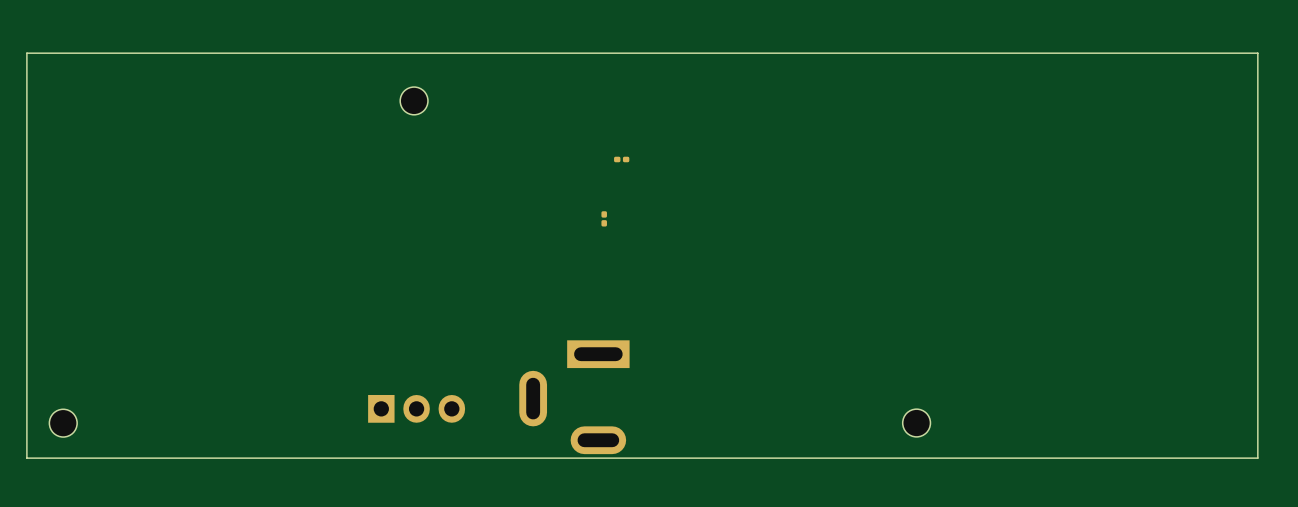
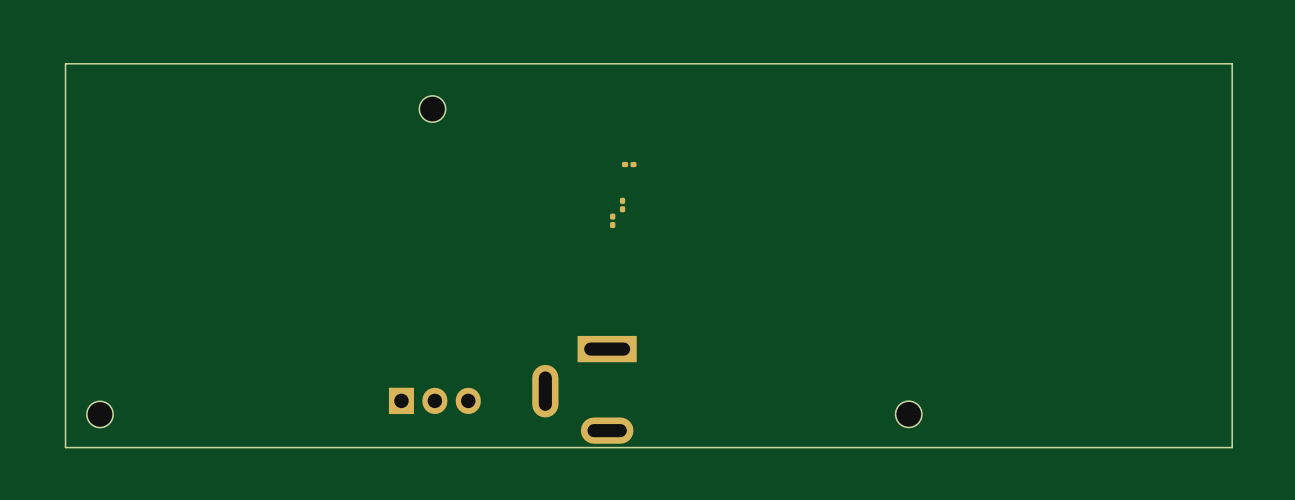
part: none -> (622, 205)

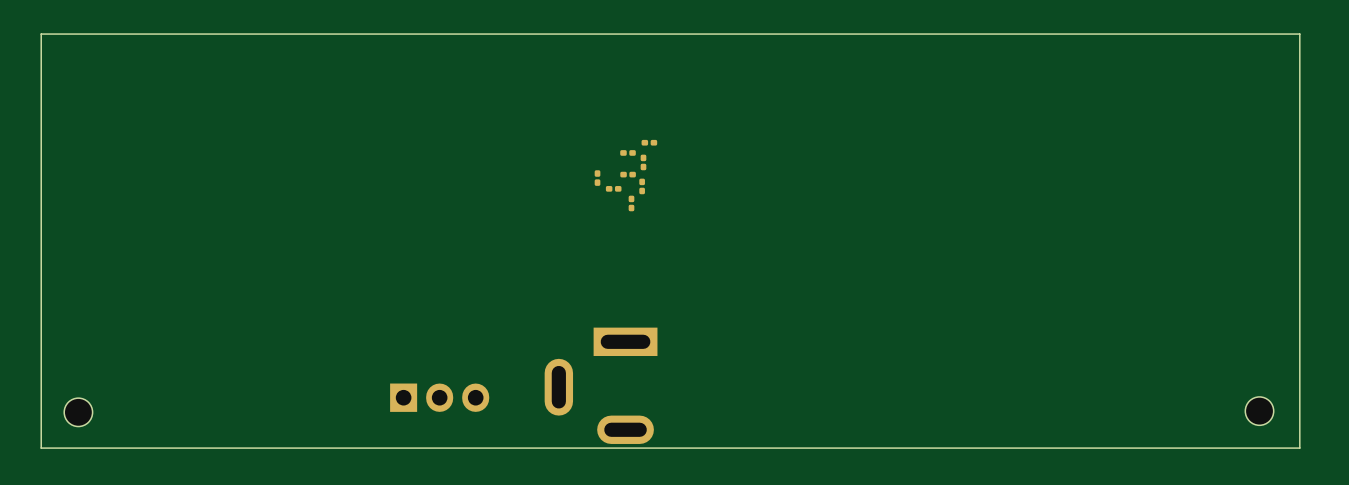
part: (432, 109) -> none
part: none -> (628, 152)
part: none -> (643, 162)
part: none -> (628, 174)
part: none -> (597, 178)
part: none -> (613, 188)
part position: (908, 414) -> (1259, 411)

